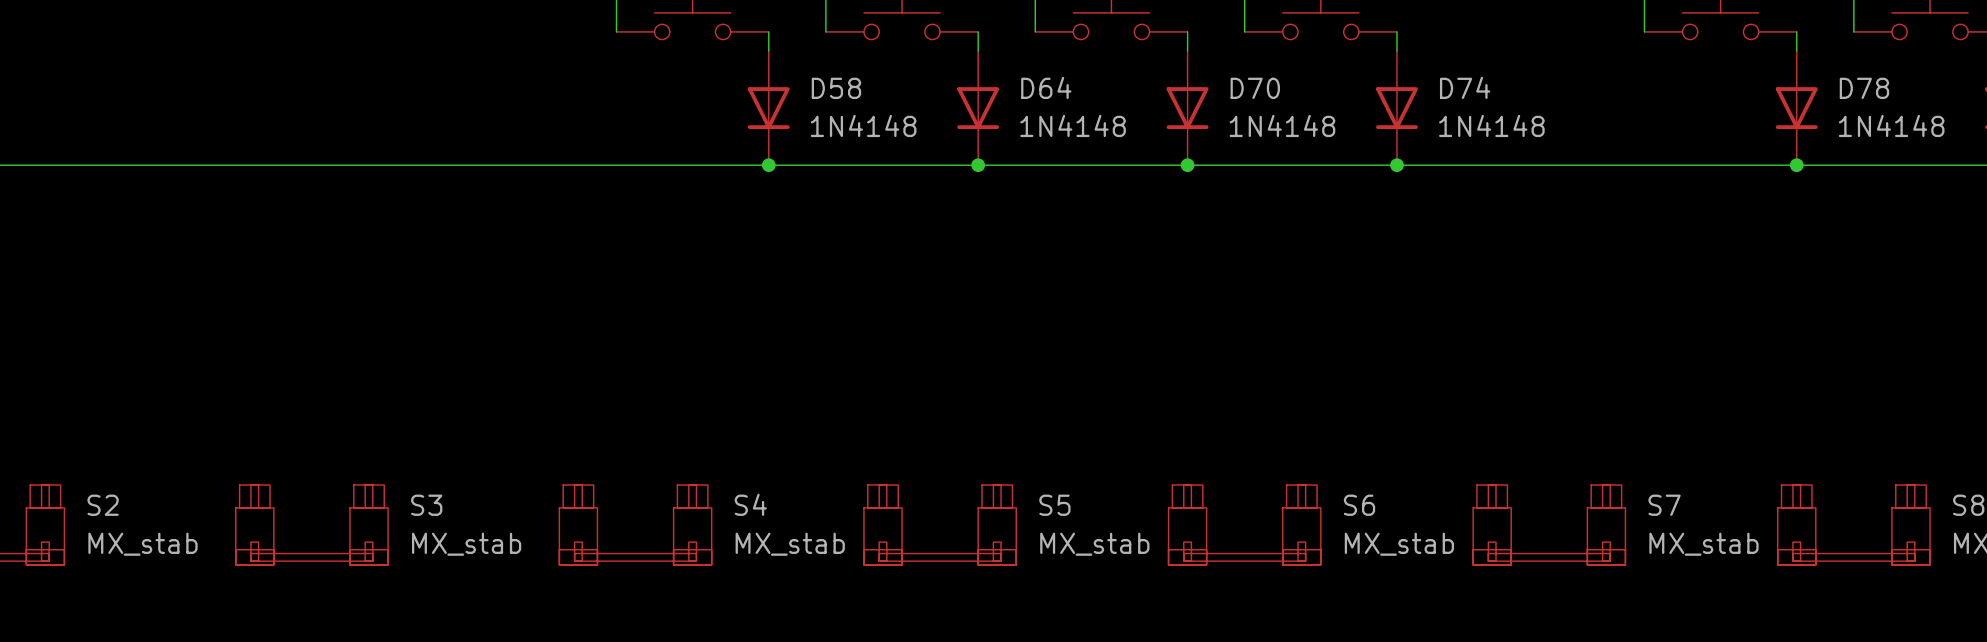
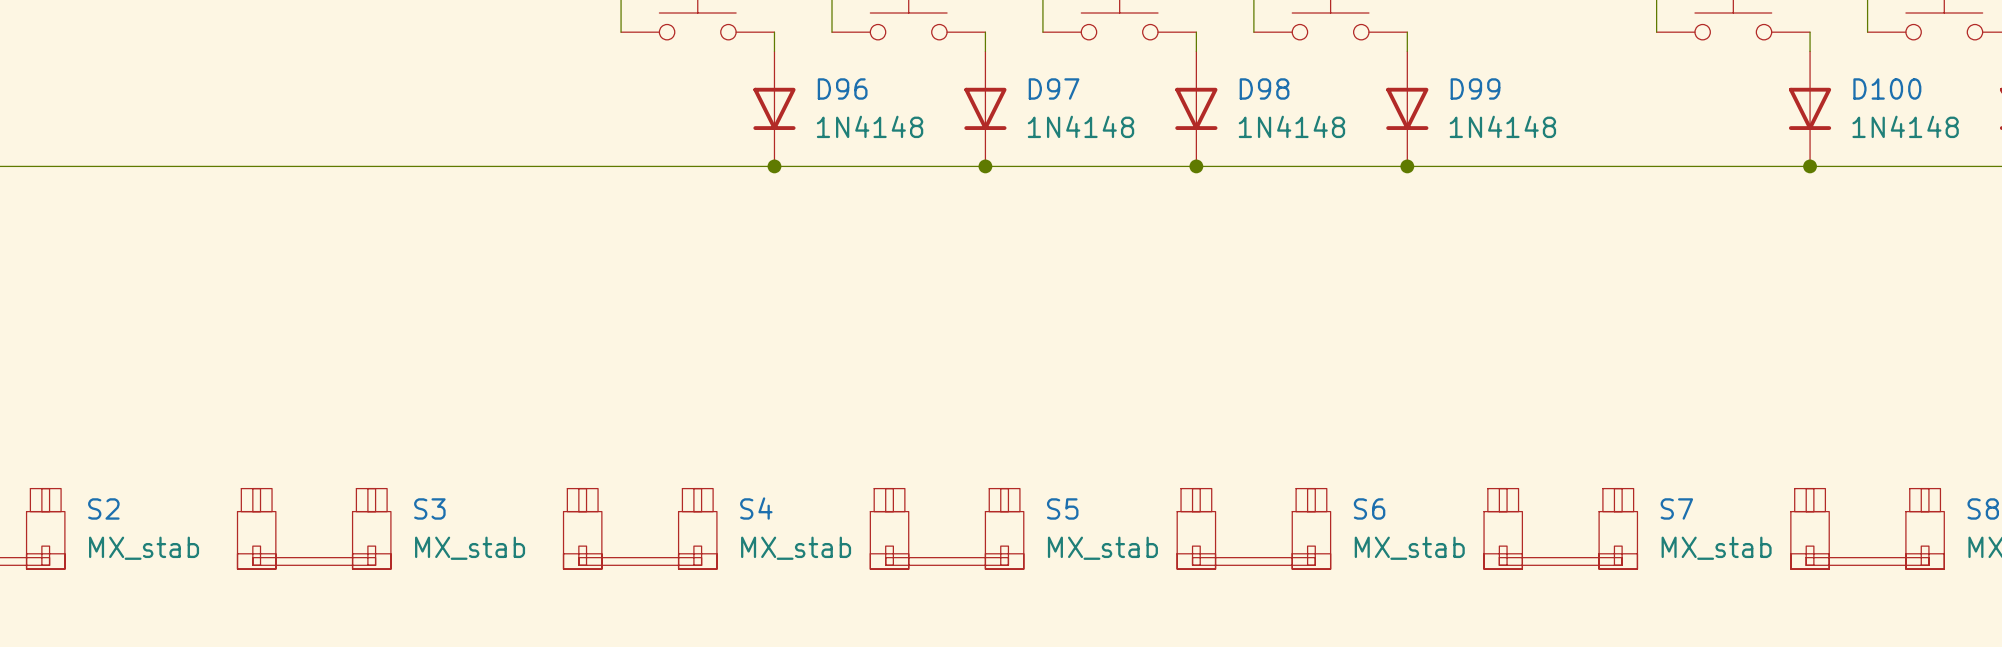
D64 name: D64 (1046, 87) -> D97 (1054, 88)
D74 name: D74 (1465, 87) -> D99 (1475, 88)
D58 name: D58 (836, 88) -> D96 (842, 88)
D70 name: D70 (1255, 88) -> D98 (1264, 88)
D78 name: D78 (1864, 88) -> D100 (1887, 88)

